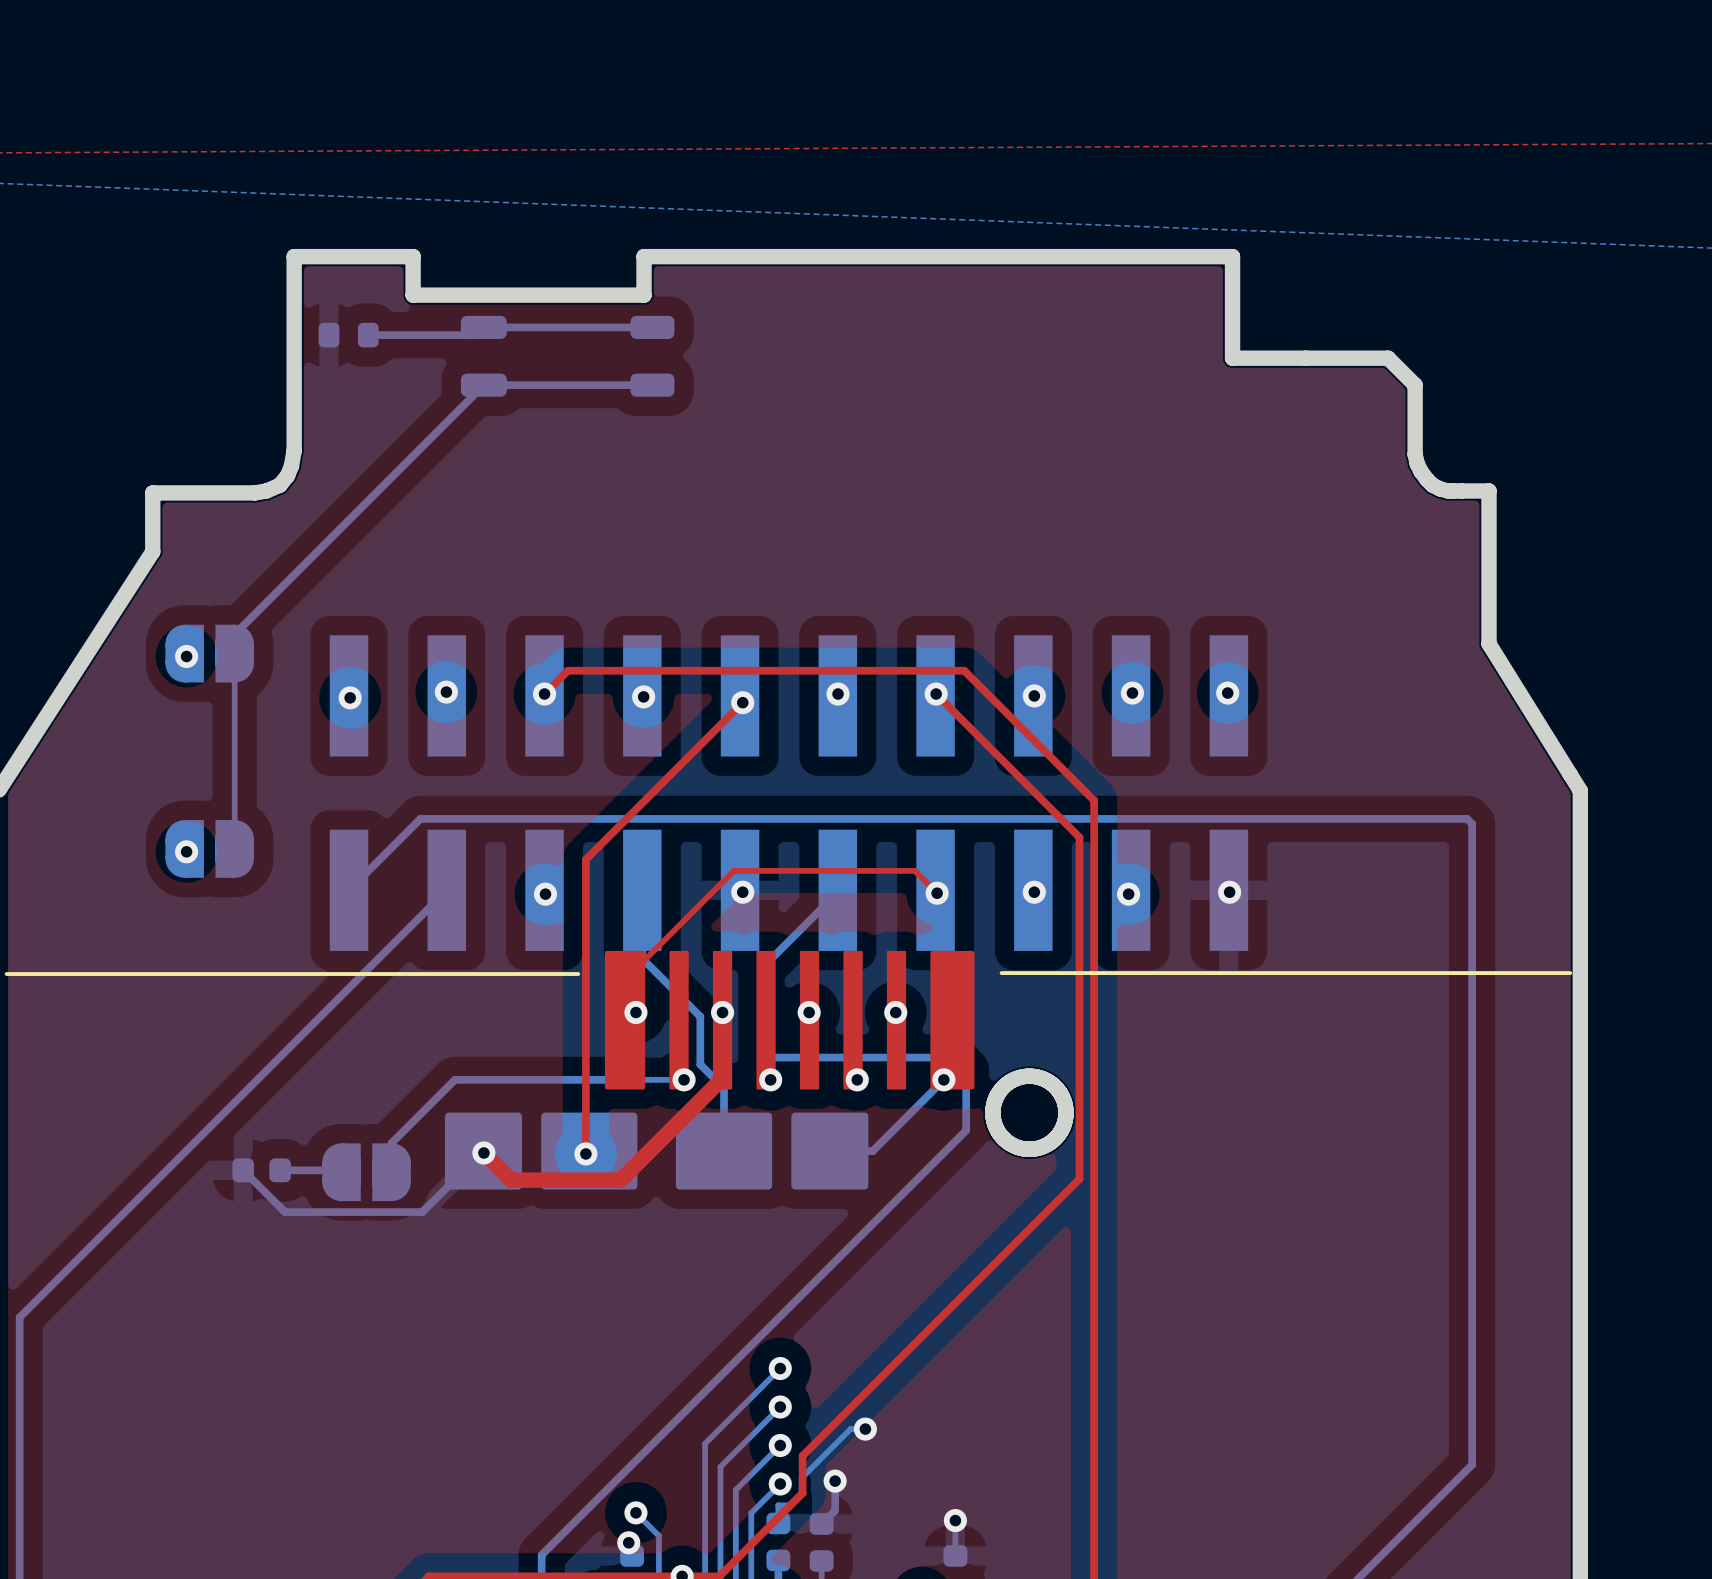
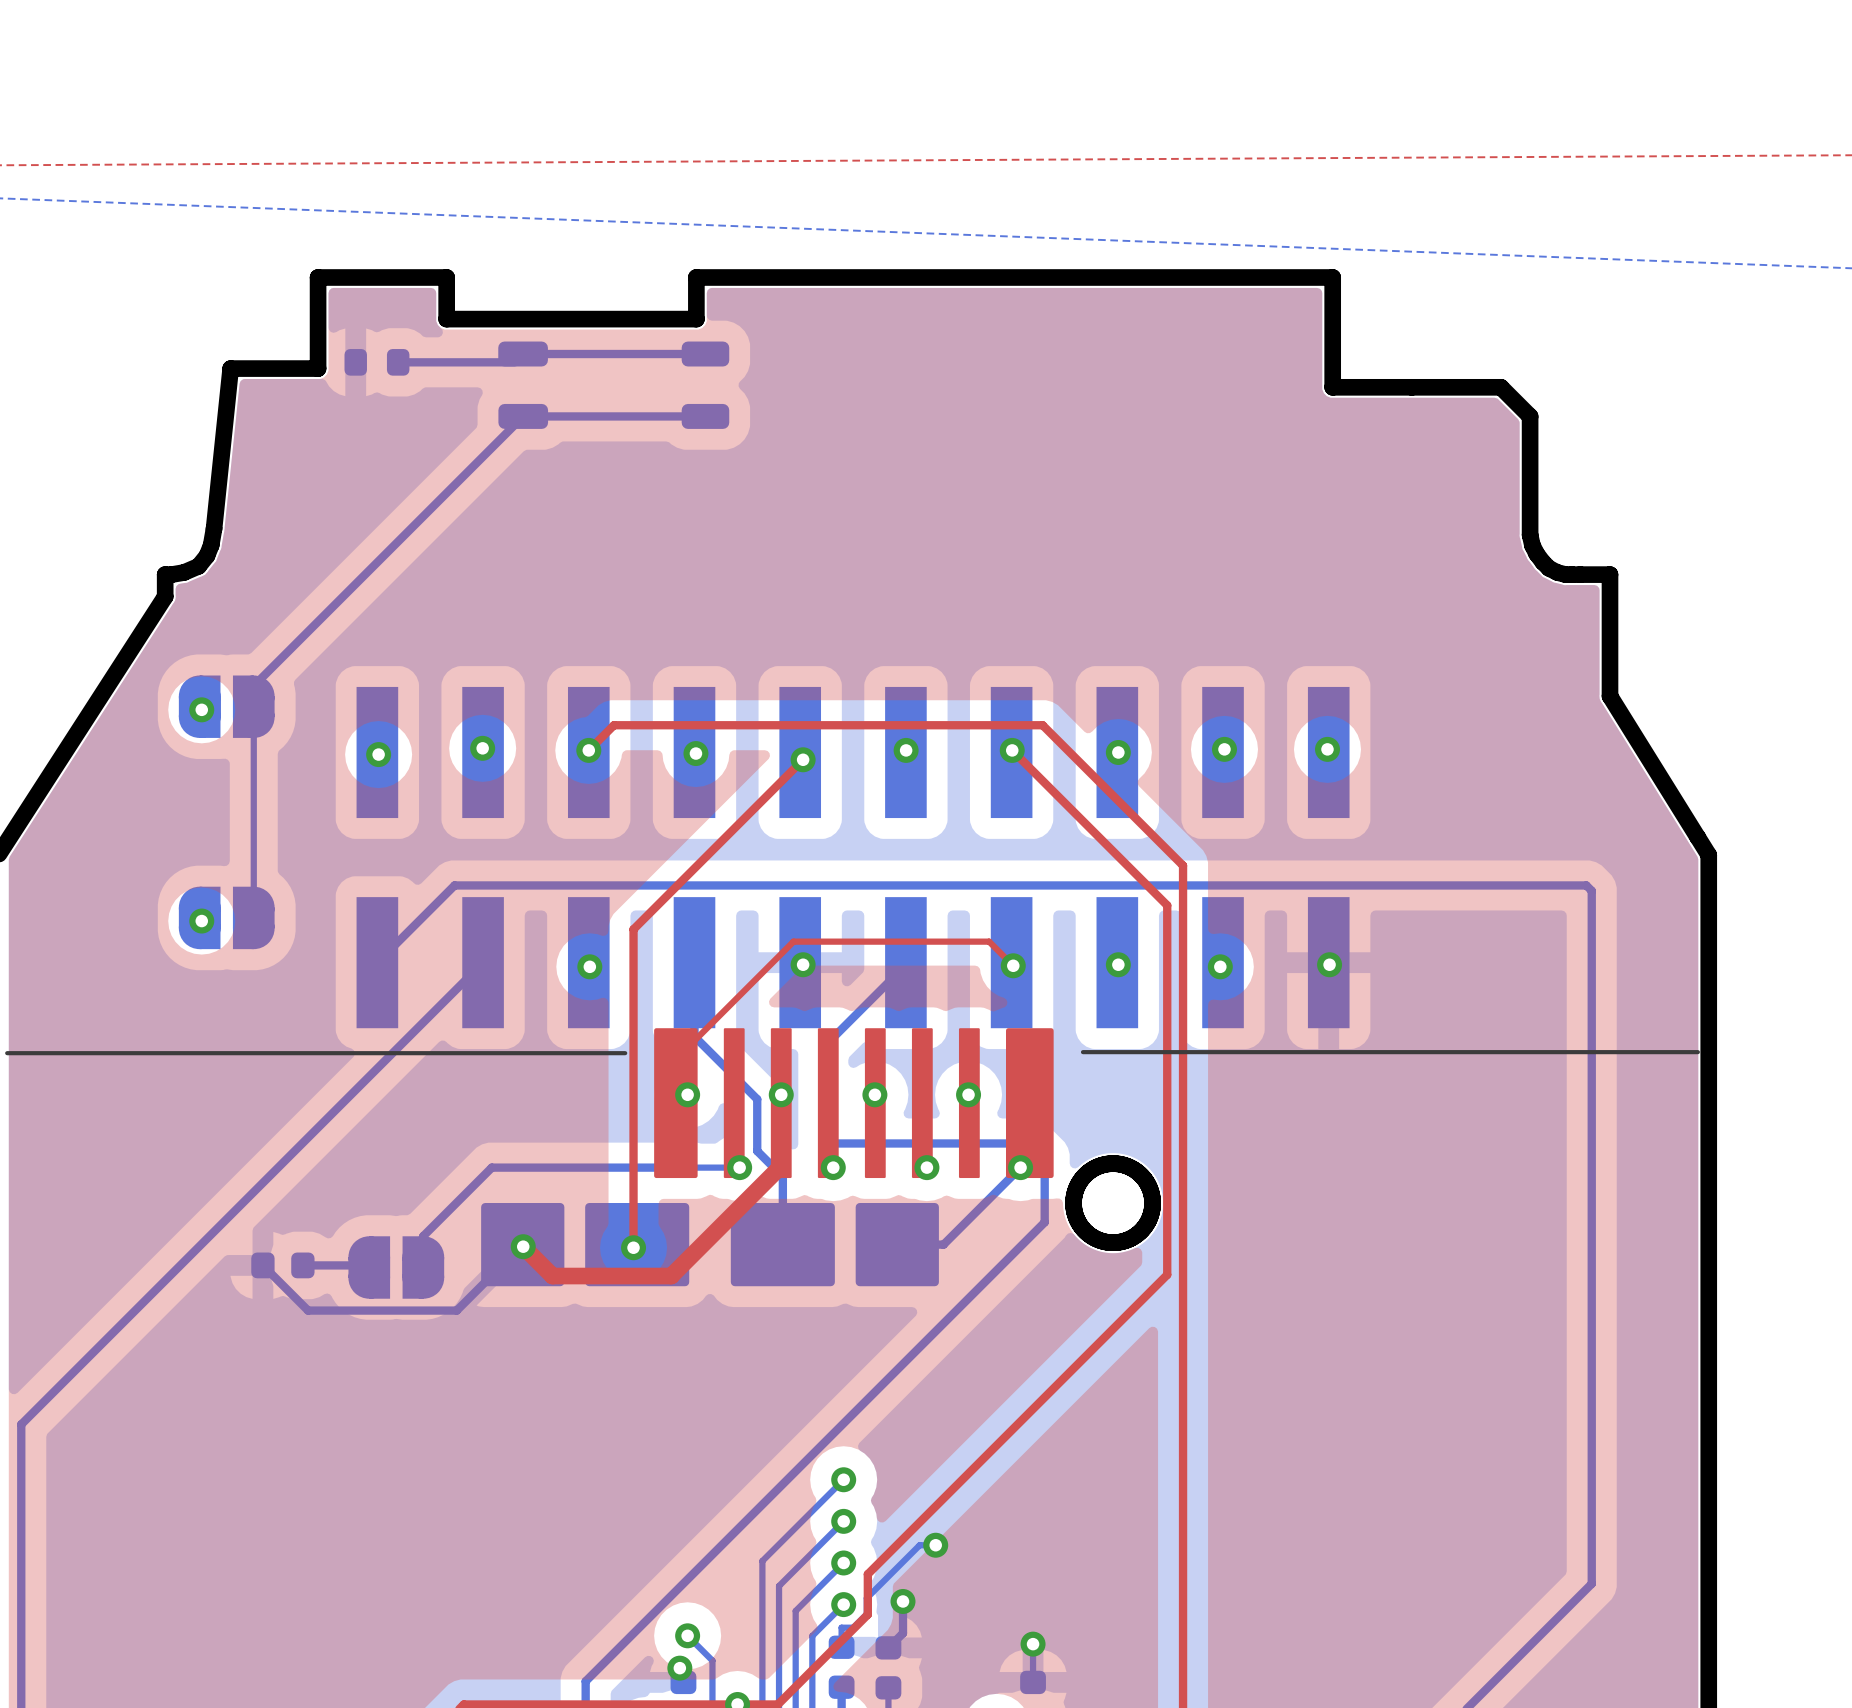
board edge: (294, 340) (294, 450) (287, 475) (279, 485) (266, 490) (254, 492) (152, 492) (152, 531) -> (318, 368) (230, 368) (211, 545) (206, 555) (198, 566) (184, 572) (165, 574)
board edge: (1415, 454) (1421, 471) (1432, 485) (1440, 489) (1448, 490) (1489, 490) (1489, 531) -> (1530, 491) (1530, 535) (1532, 545) (1542, 562) (1549, 568) (1565, 574) (1610, 574)

